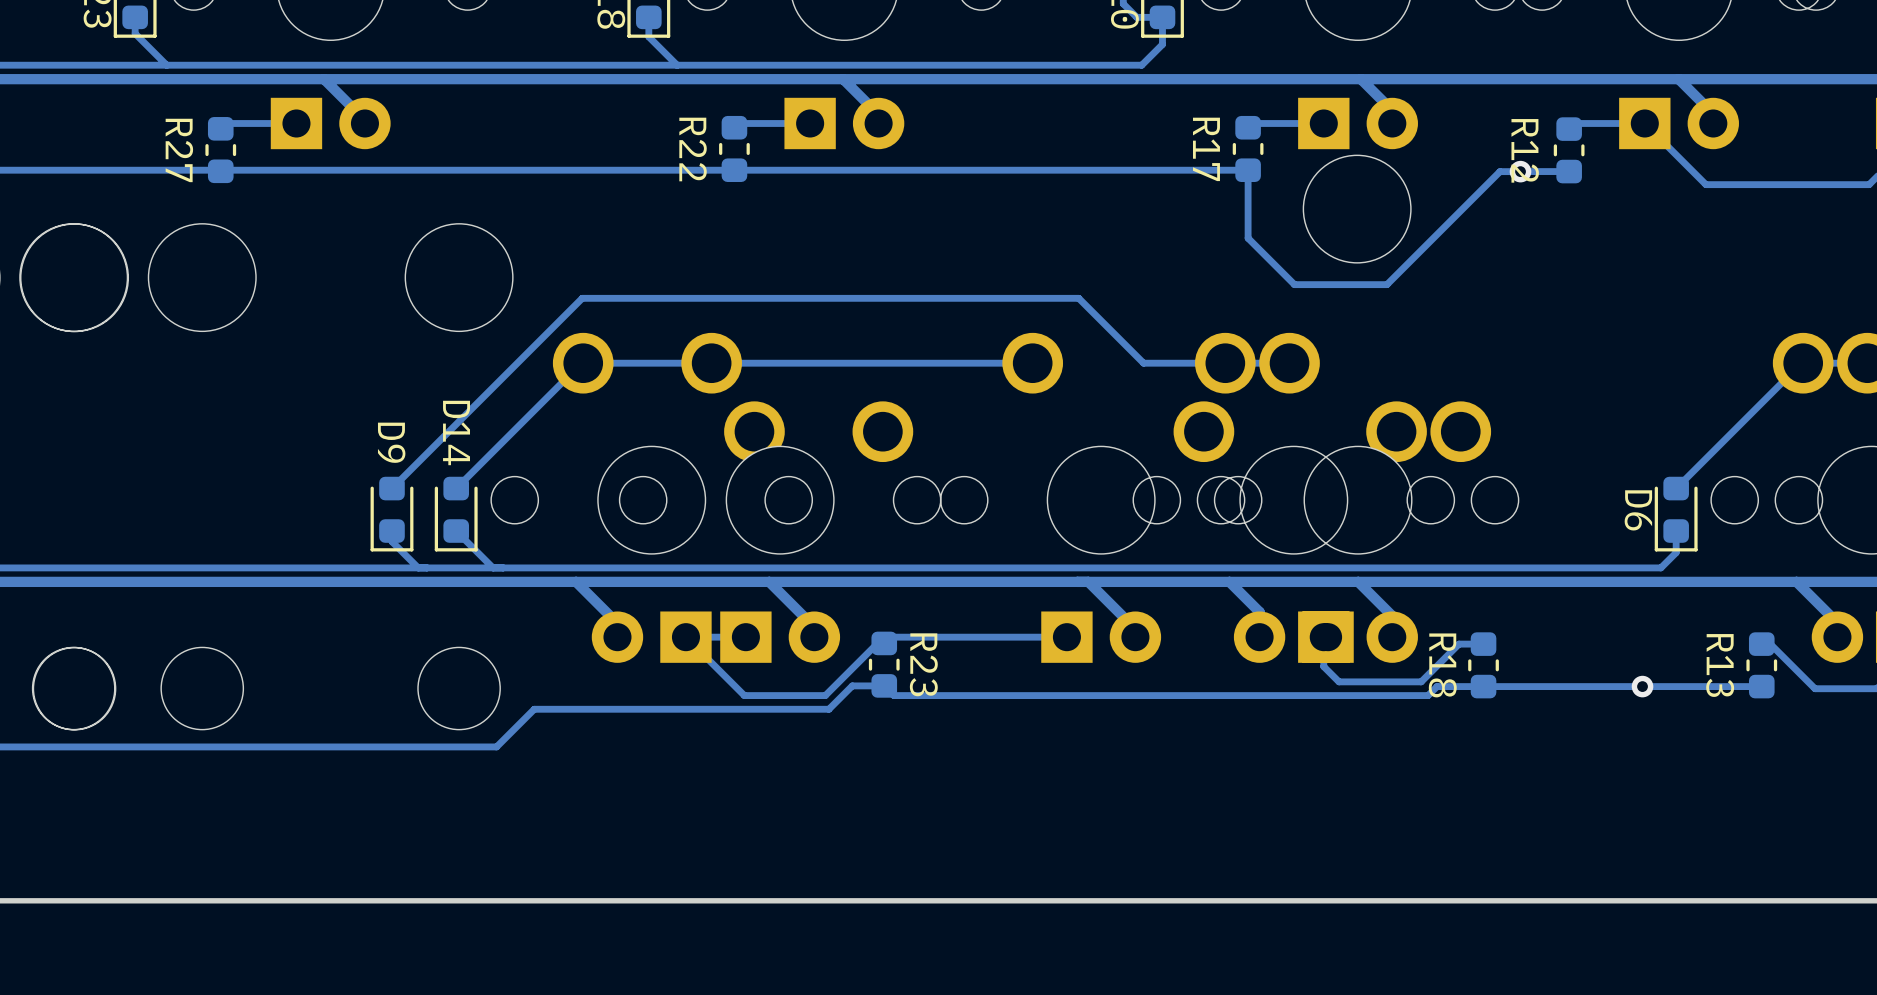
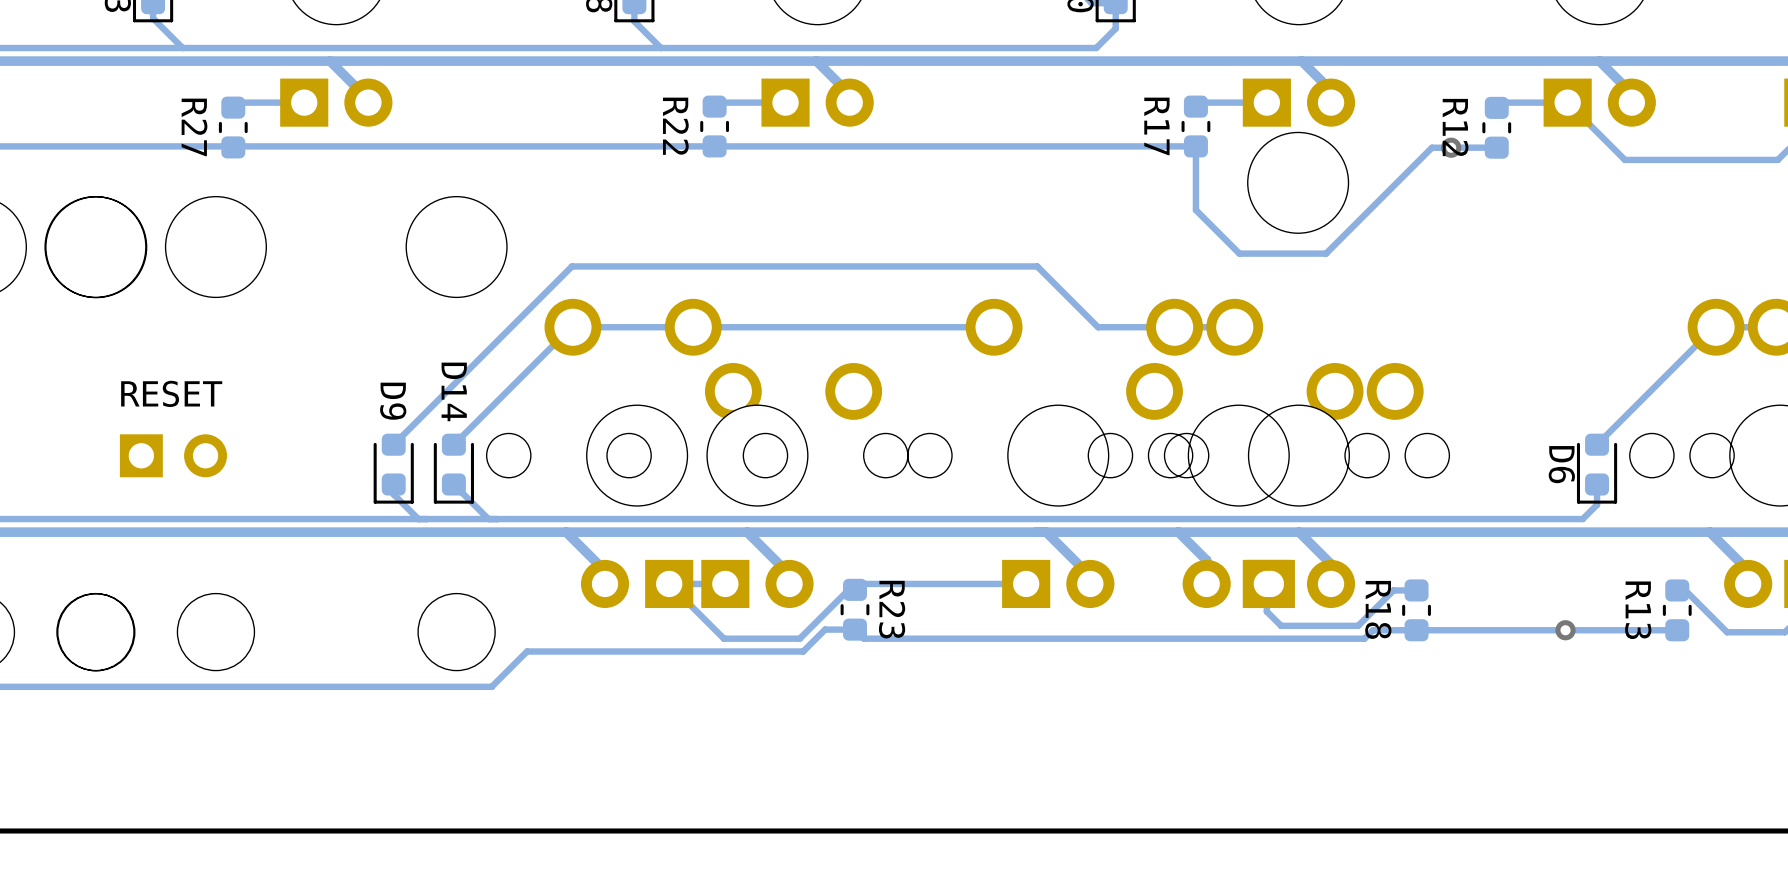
part: none -> (173, 455)

